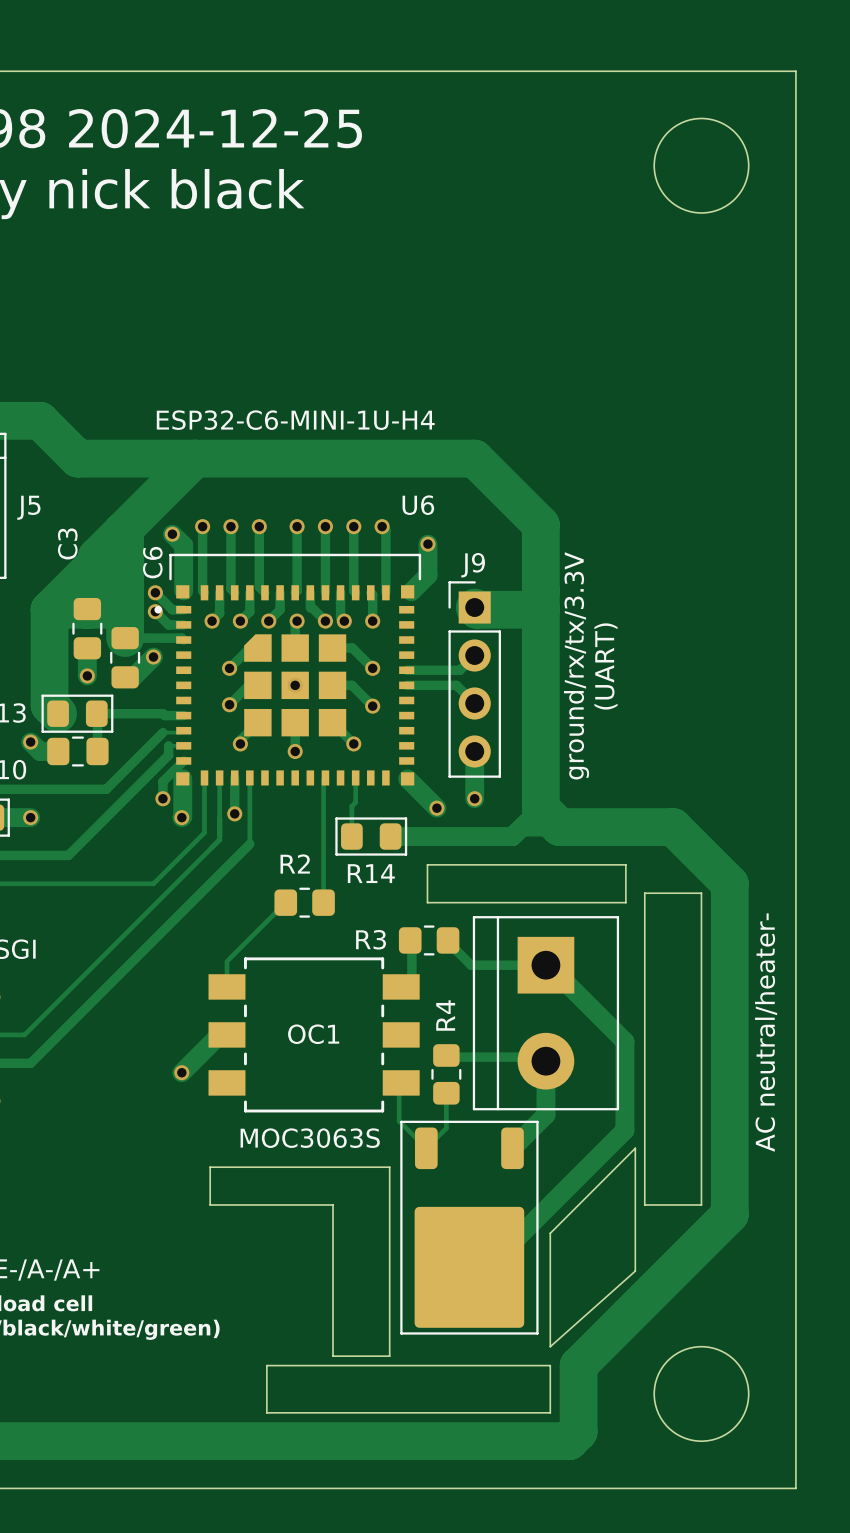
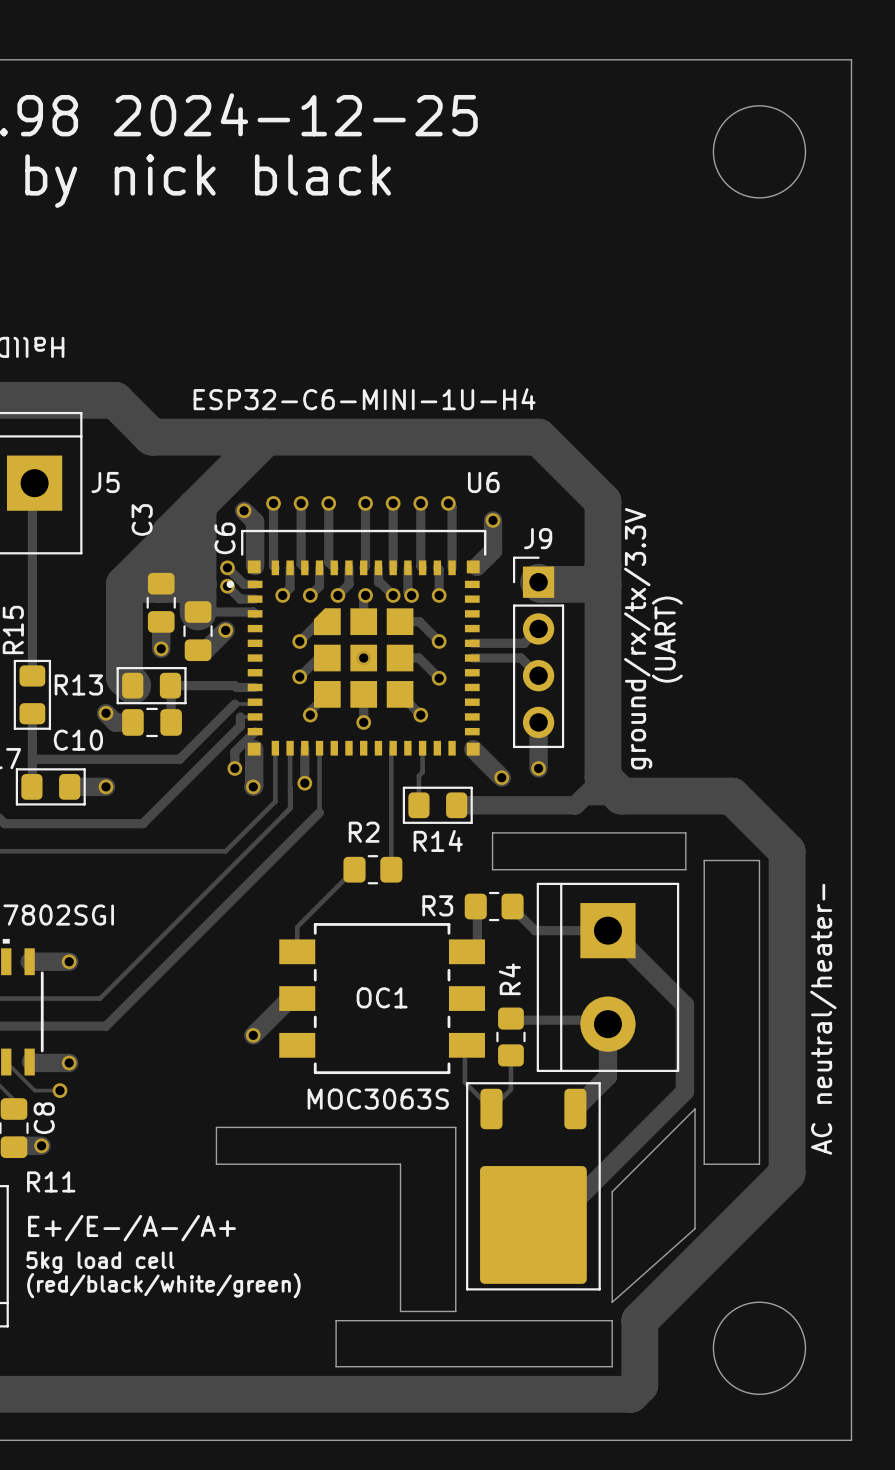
board edge: (210, 1167) (210, 1204) -> (280, 1127) (216, 1127) (216, 1164) (280, 1164)

